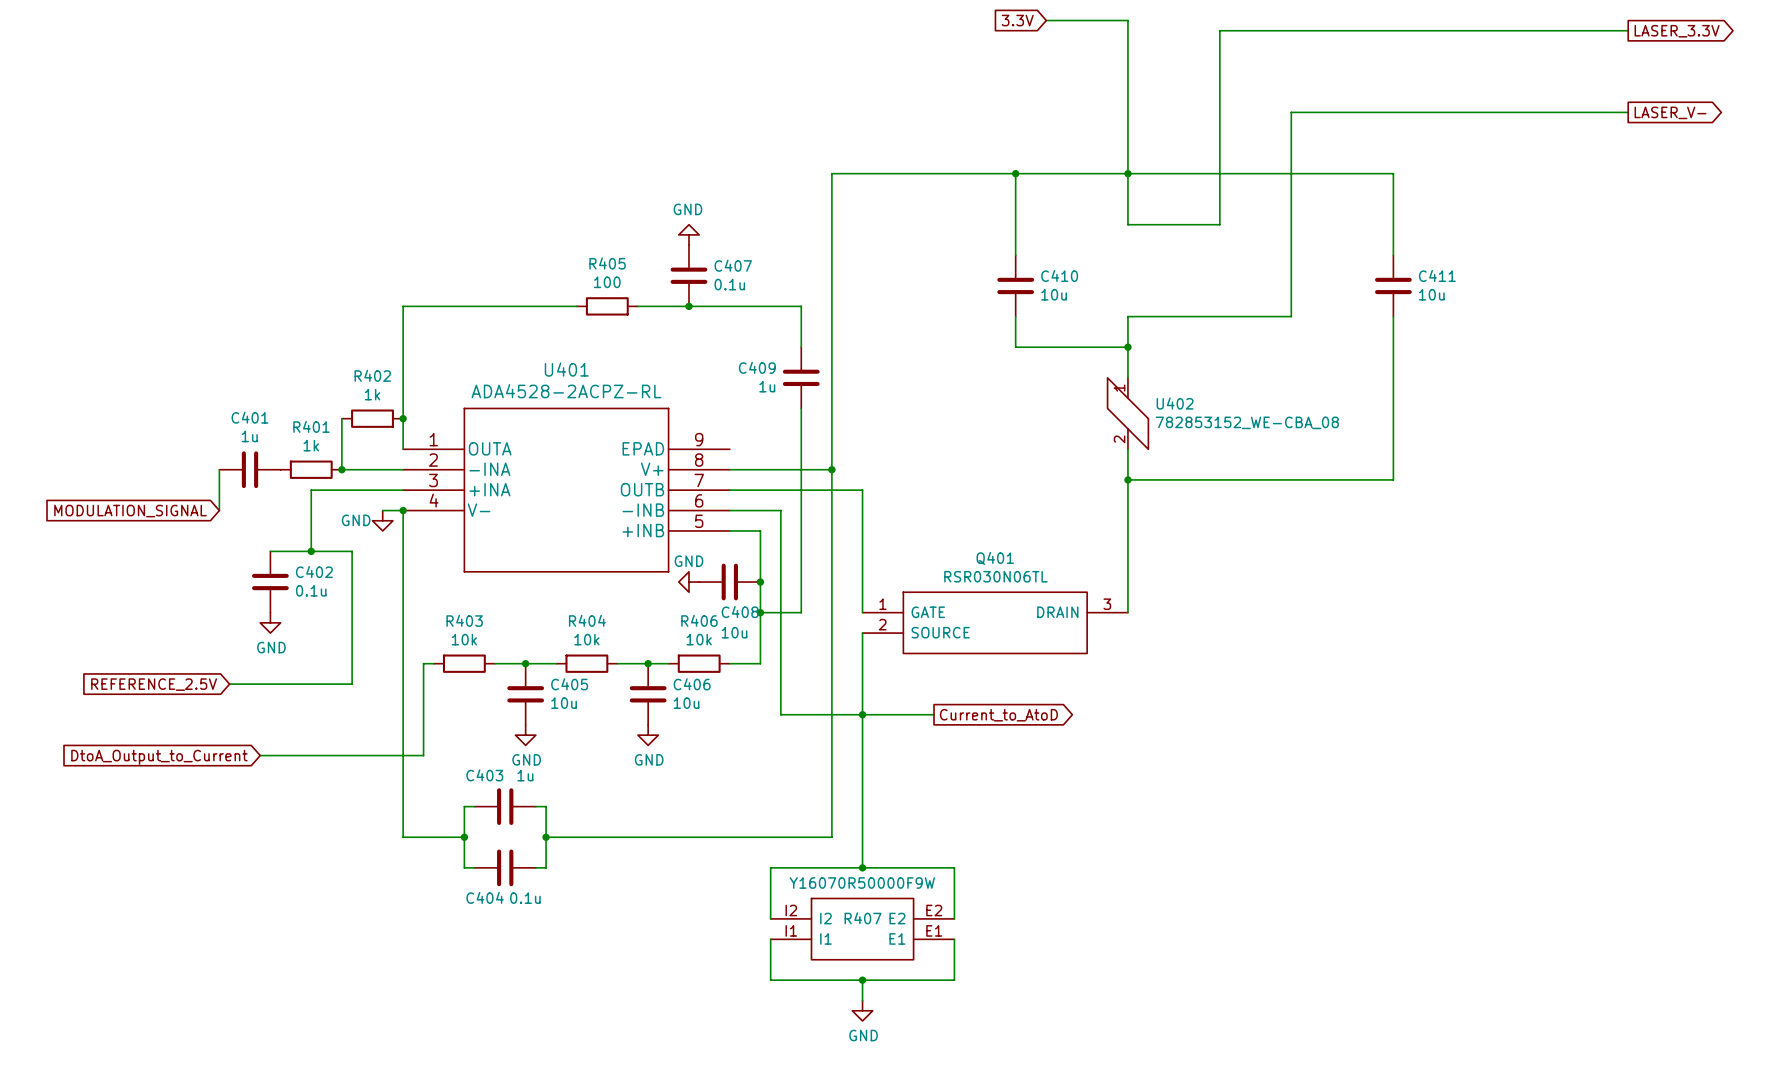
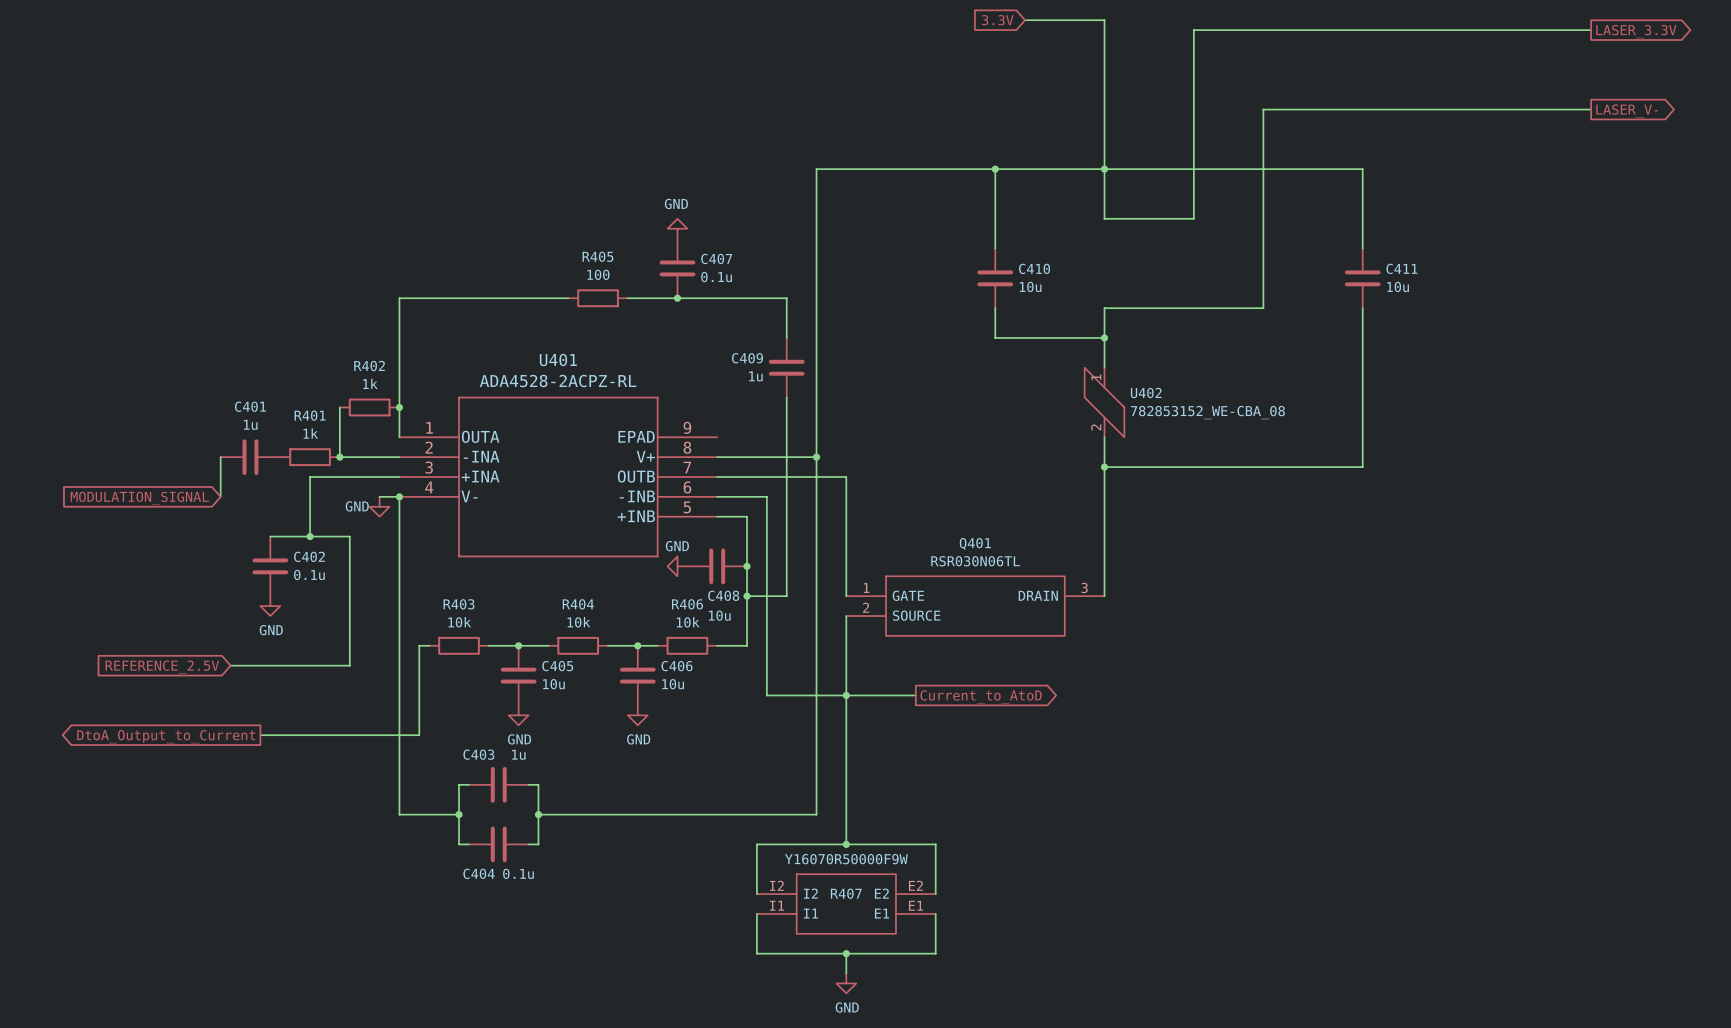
global label shape: input (159, 757) -> output (166, 736)

